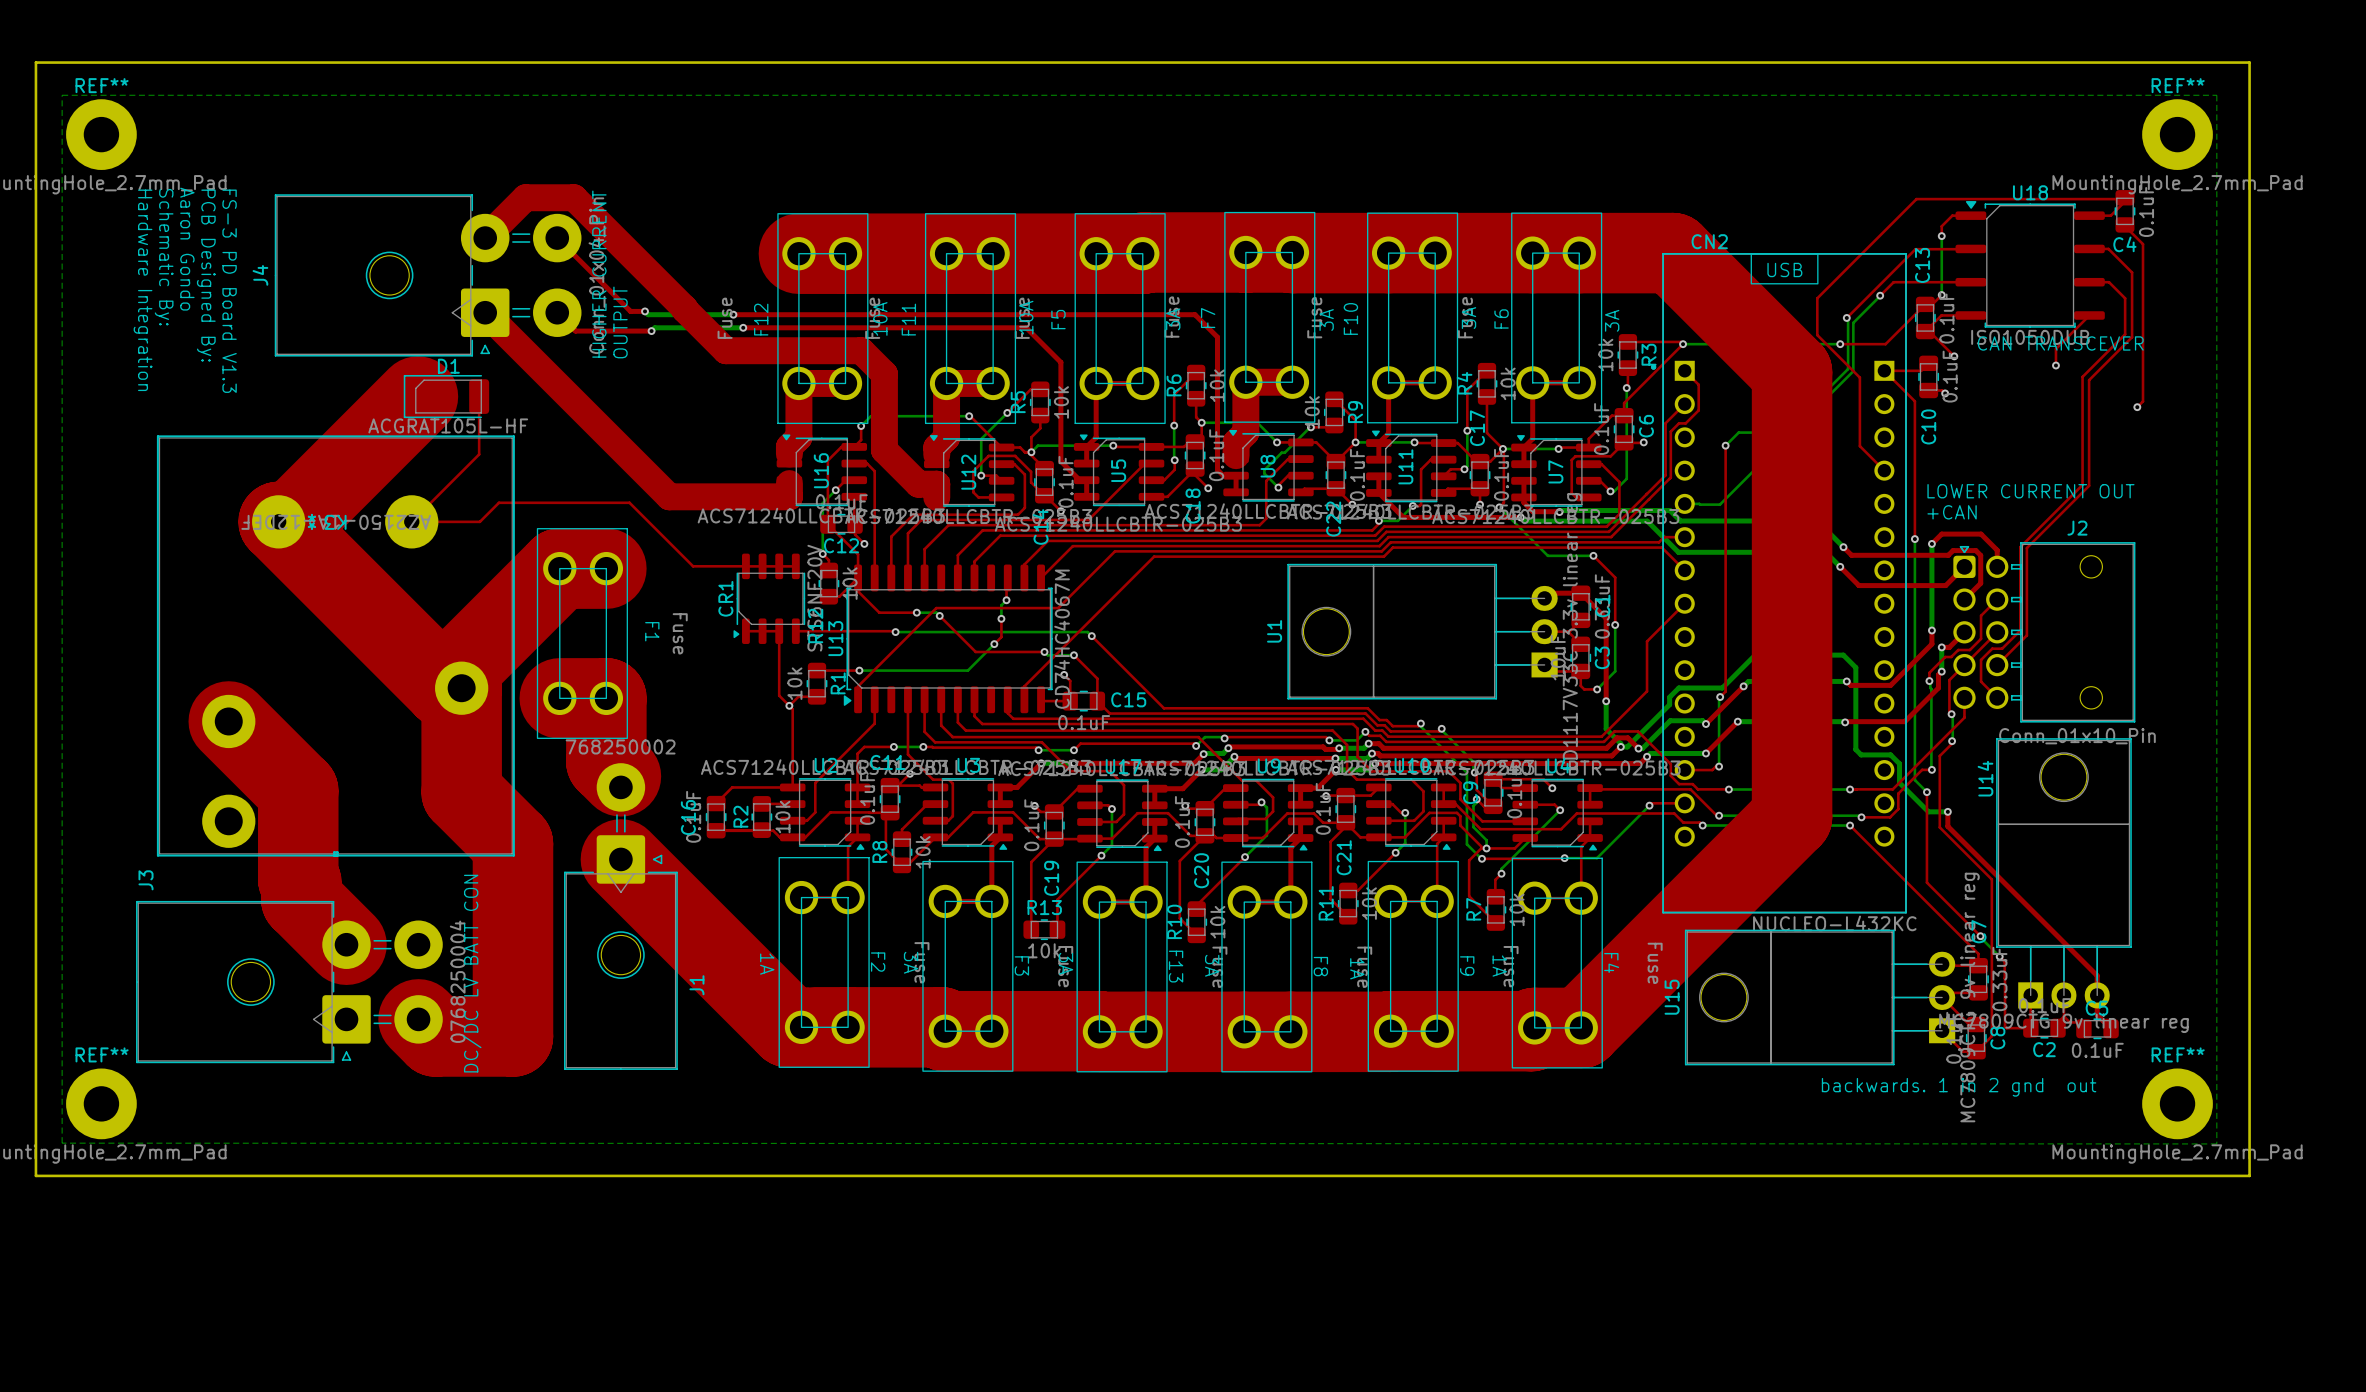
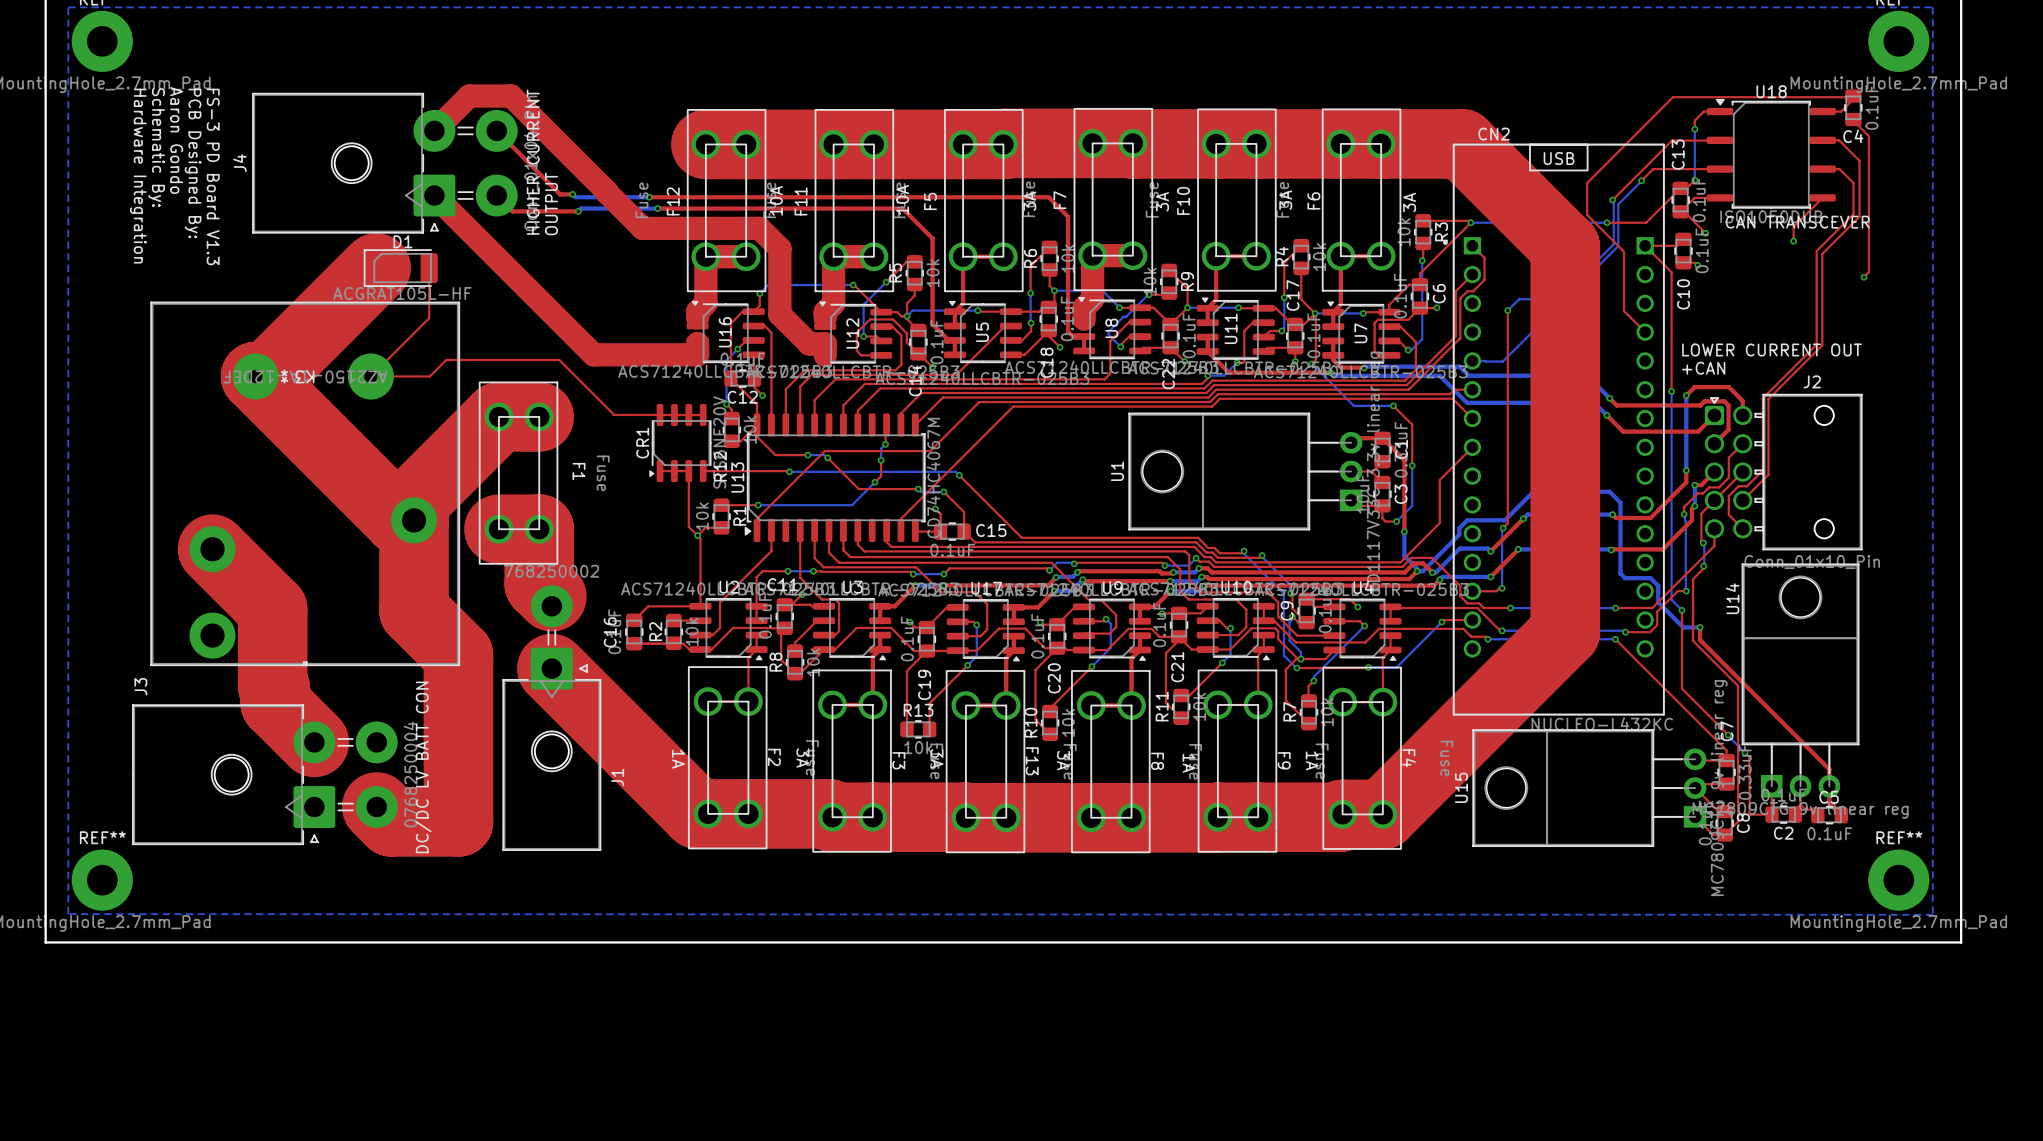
text: backwards. 1 in 2 gnd out (1959, 1087) -> none

